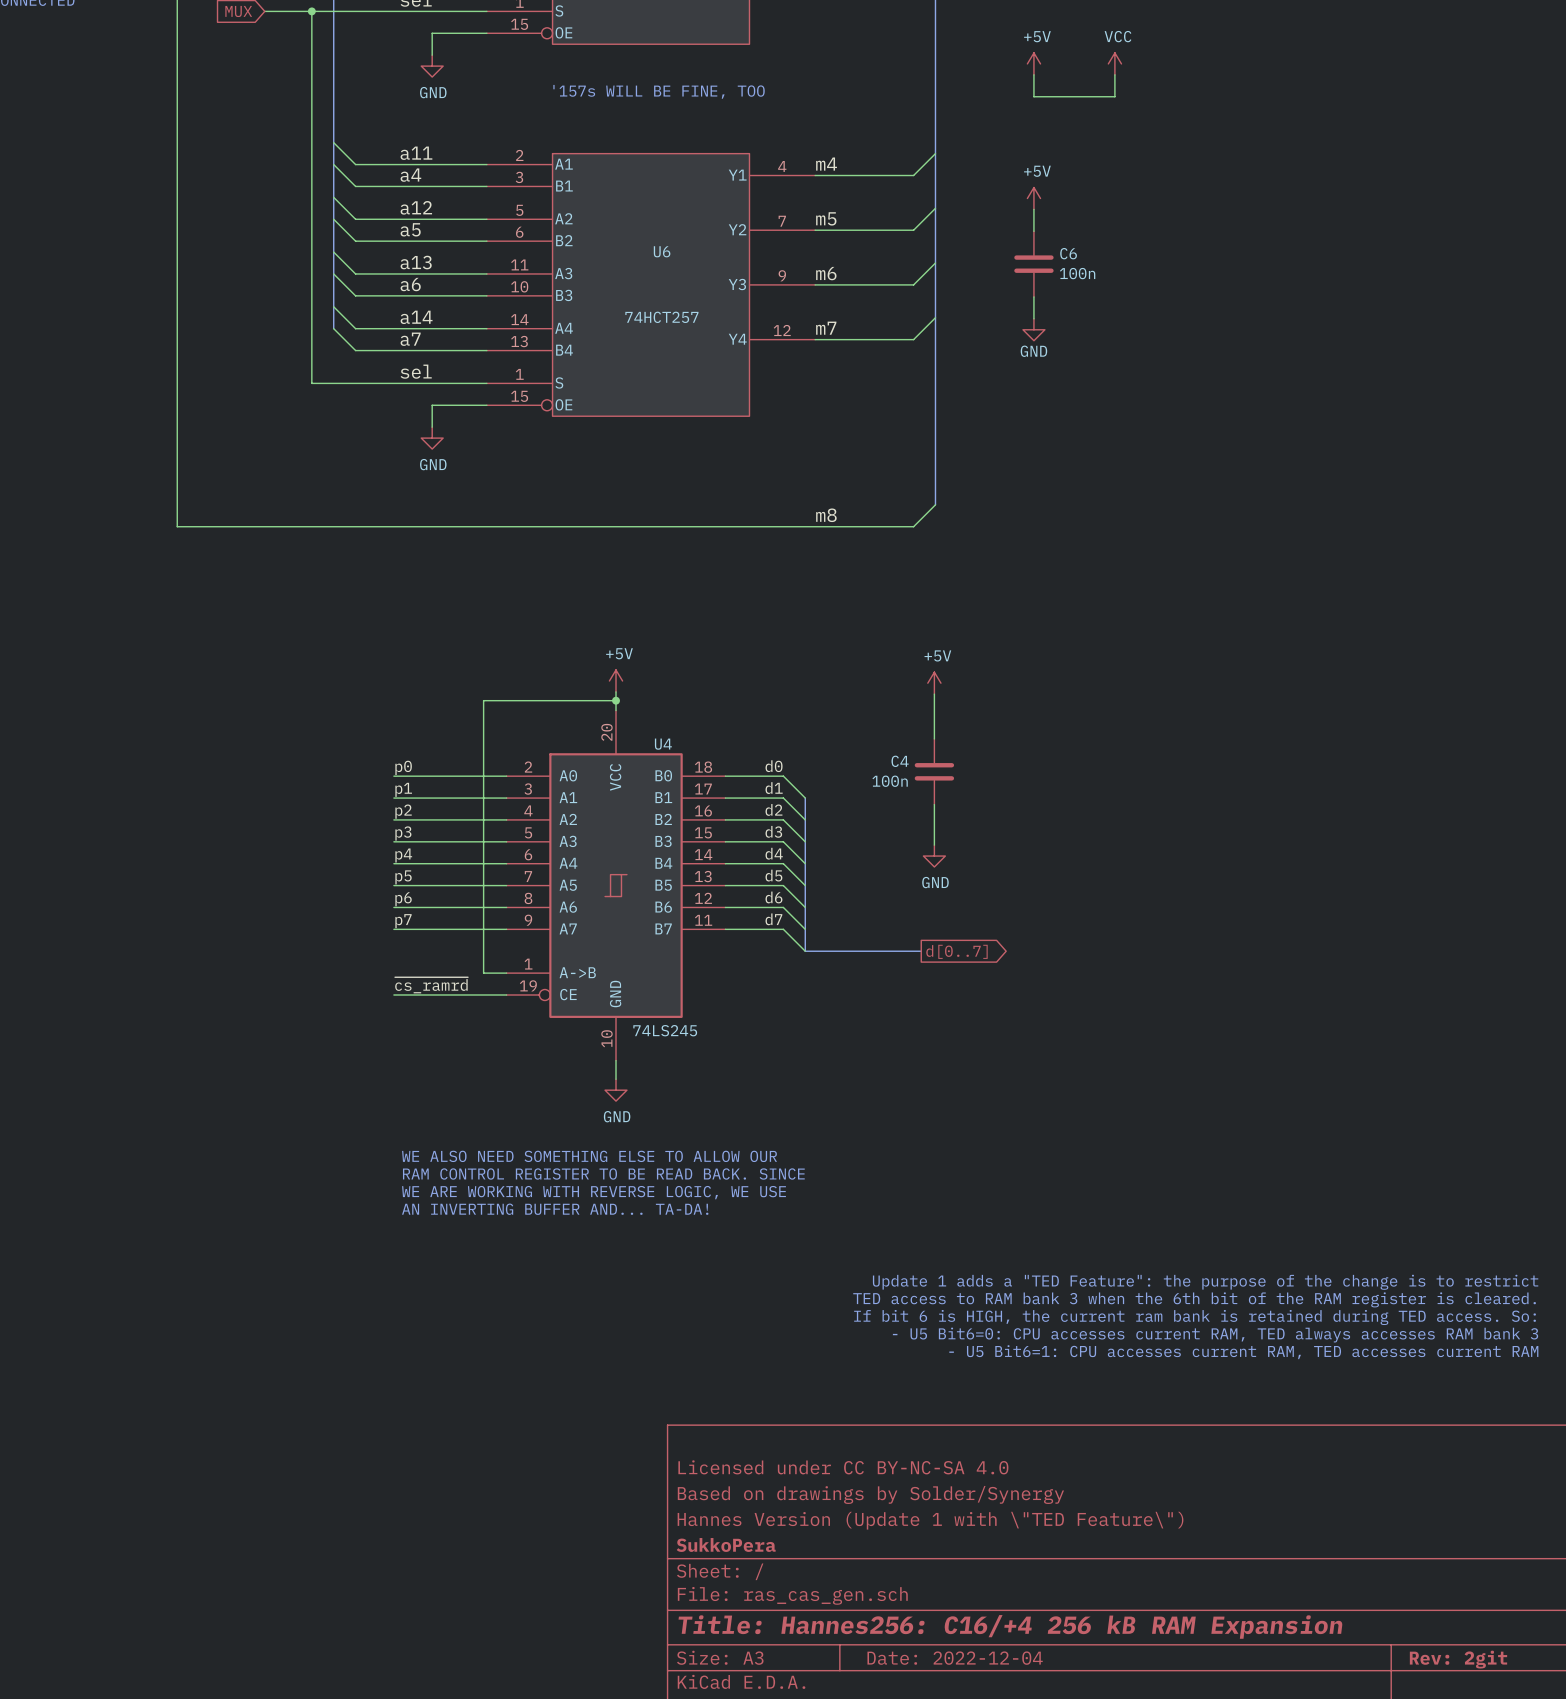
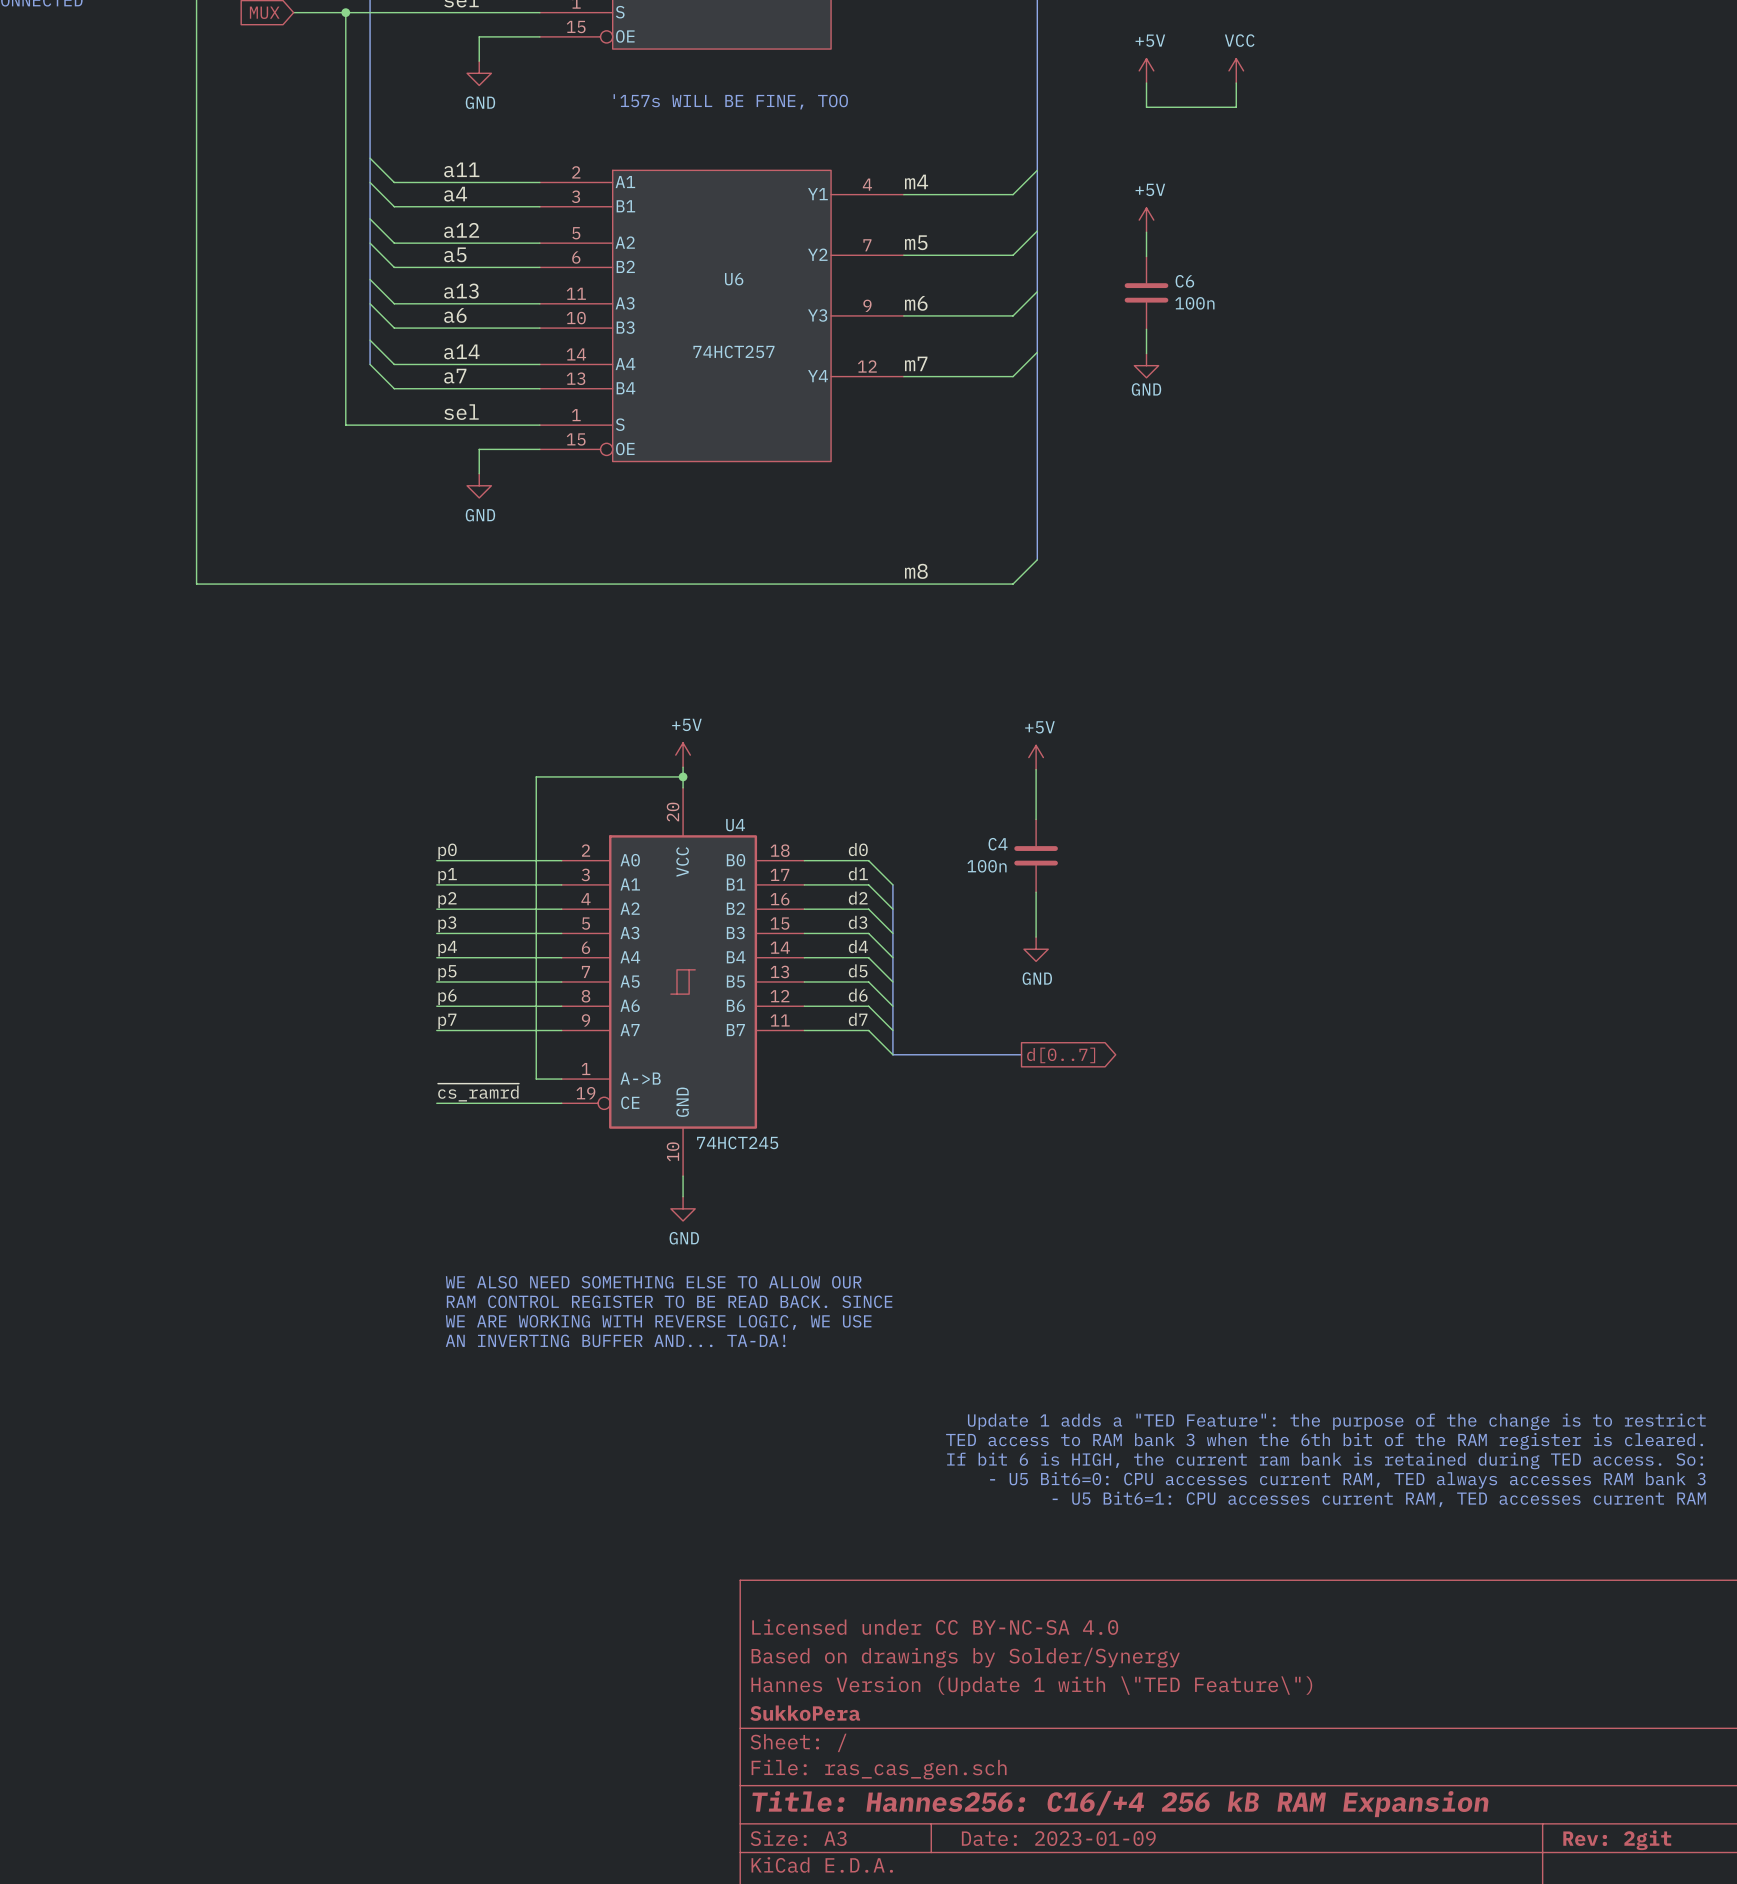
U4 value: 74LS245 (665, 1030) -> 74HCT245 (737, 1142)
title block: Date: 2022-12-04 (955, 1658) -> Date: 2023-01-09 (1058, 1838)

